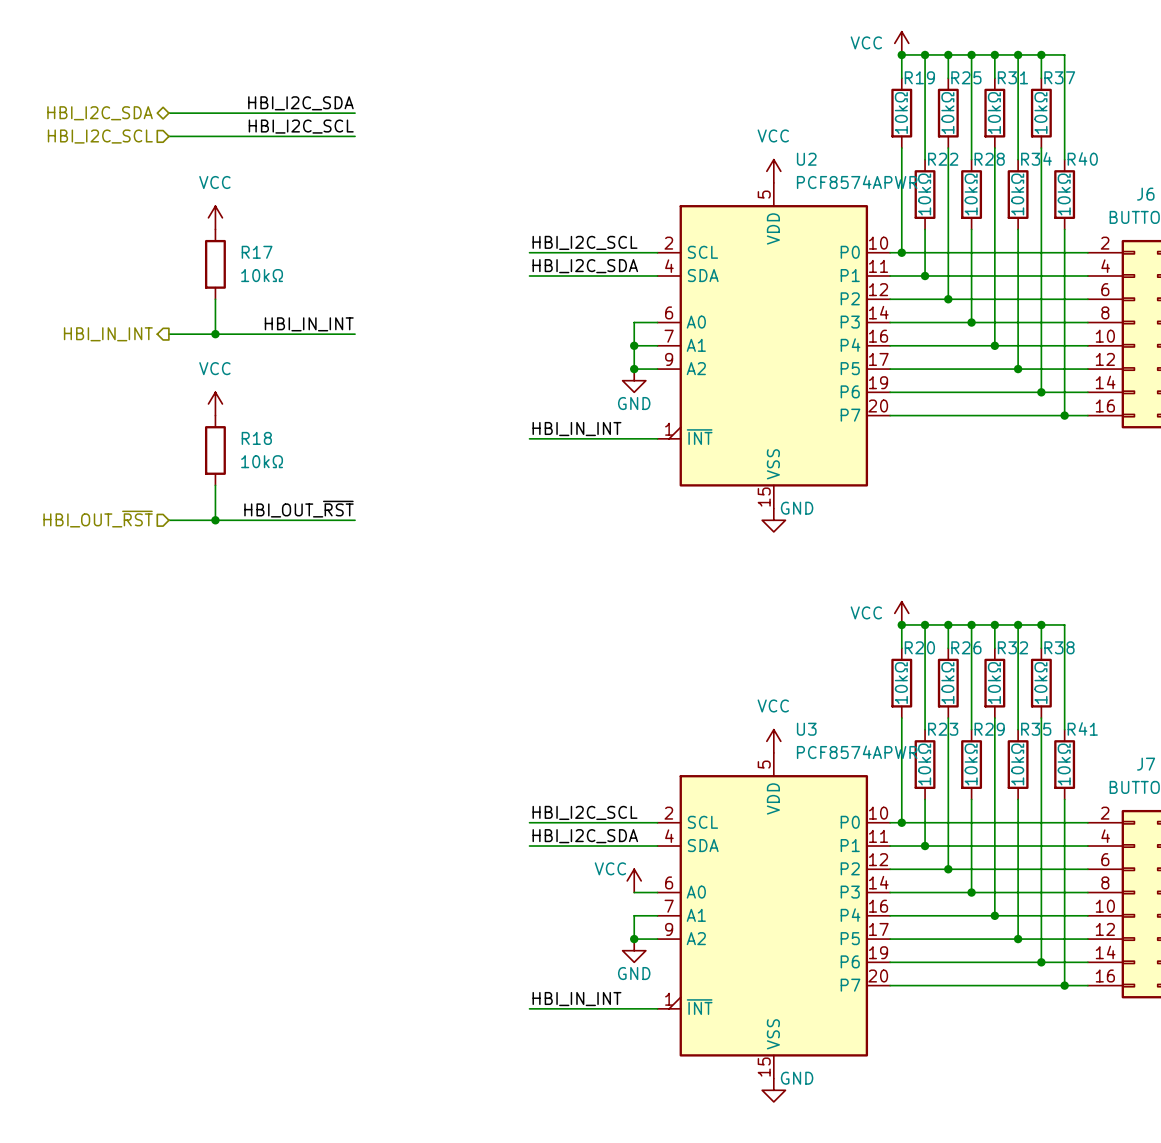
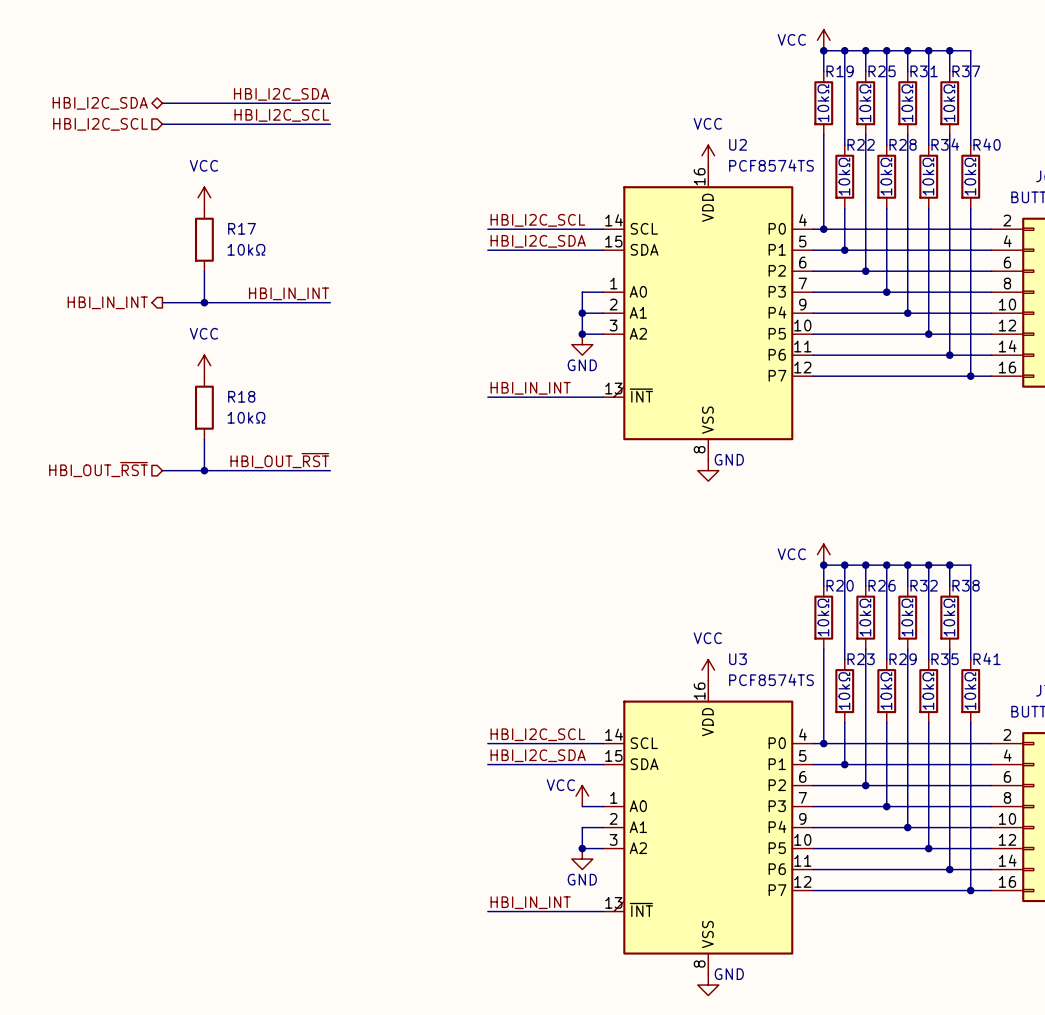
U2 symbol: [657, 182, 891, 509] -> [603, 166, 814, 461]
U2 value: PCF8574APWR (857, 182) -> PCF8574TS (771, 165)
U3 symbol: [657, 752, 891, 1079] -> [603, 680, 814, 975]
U3 value: PCF8574APWR (857, 752) -> PCF8574TS (771, 679)

